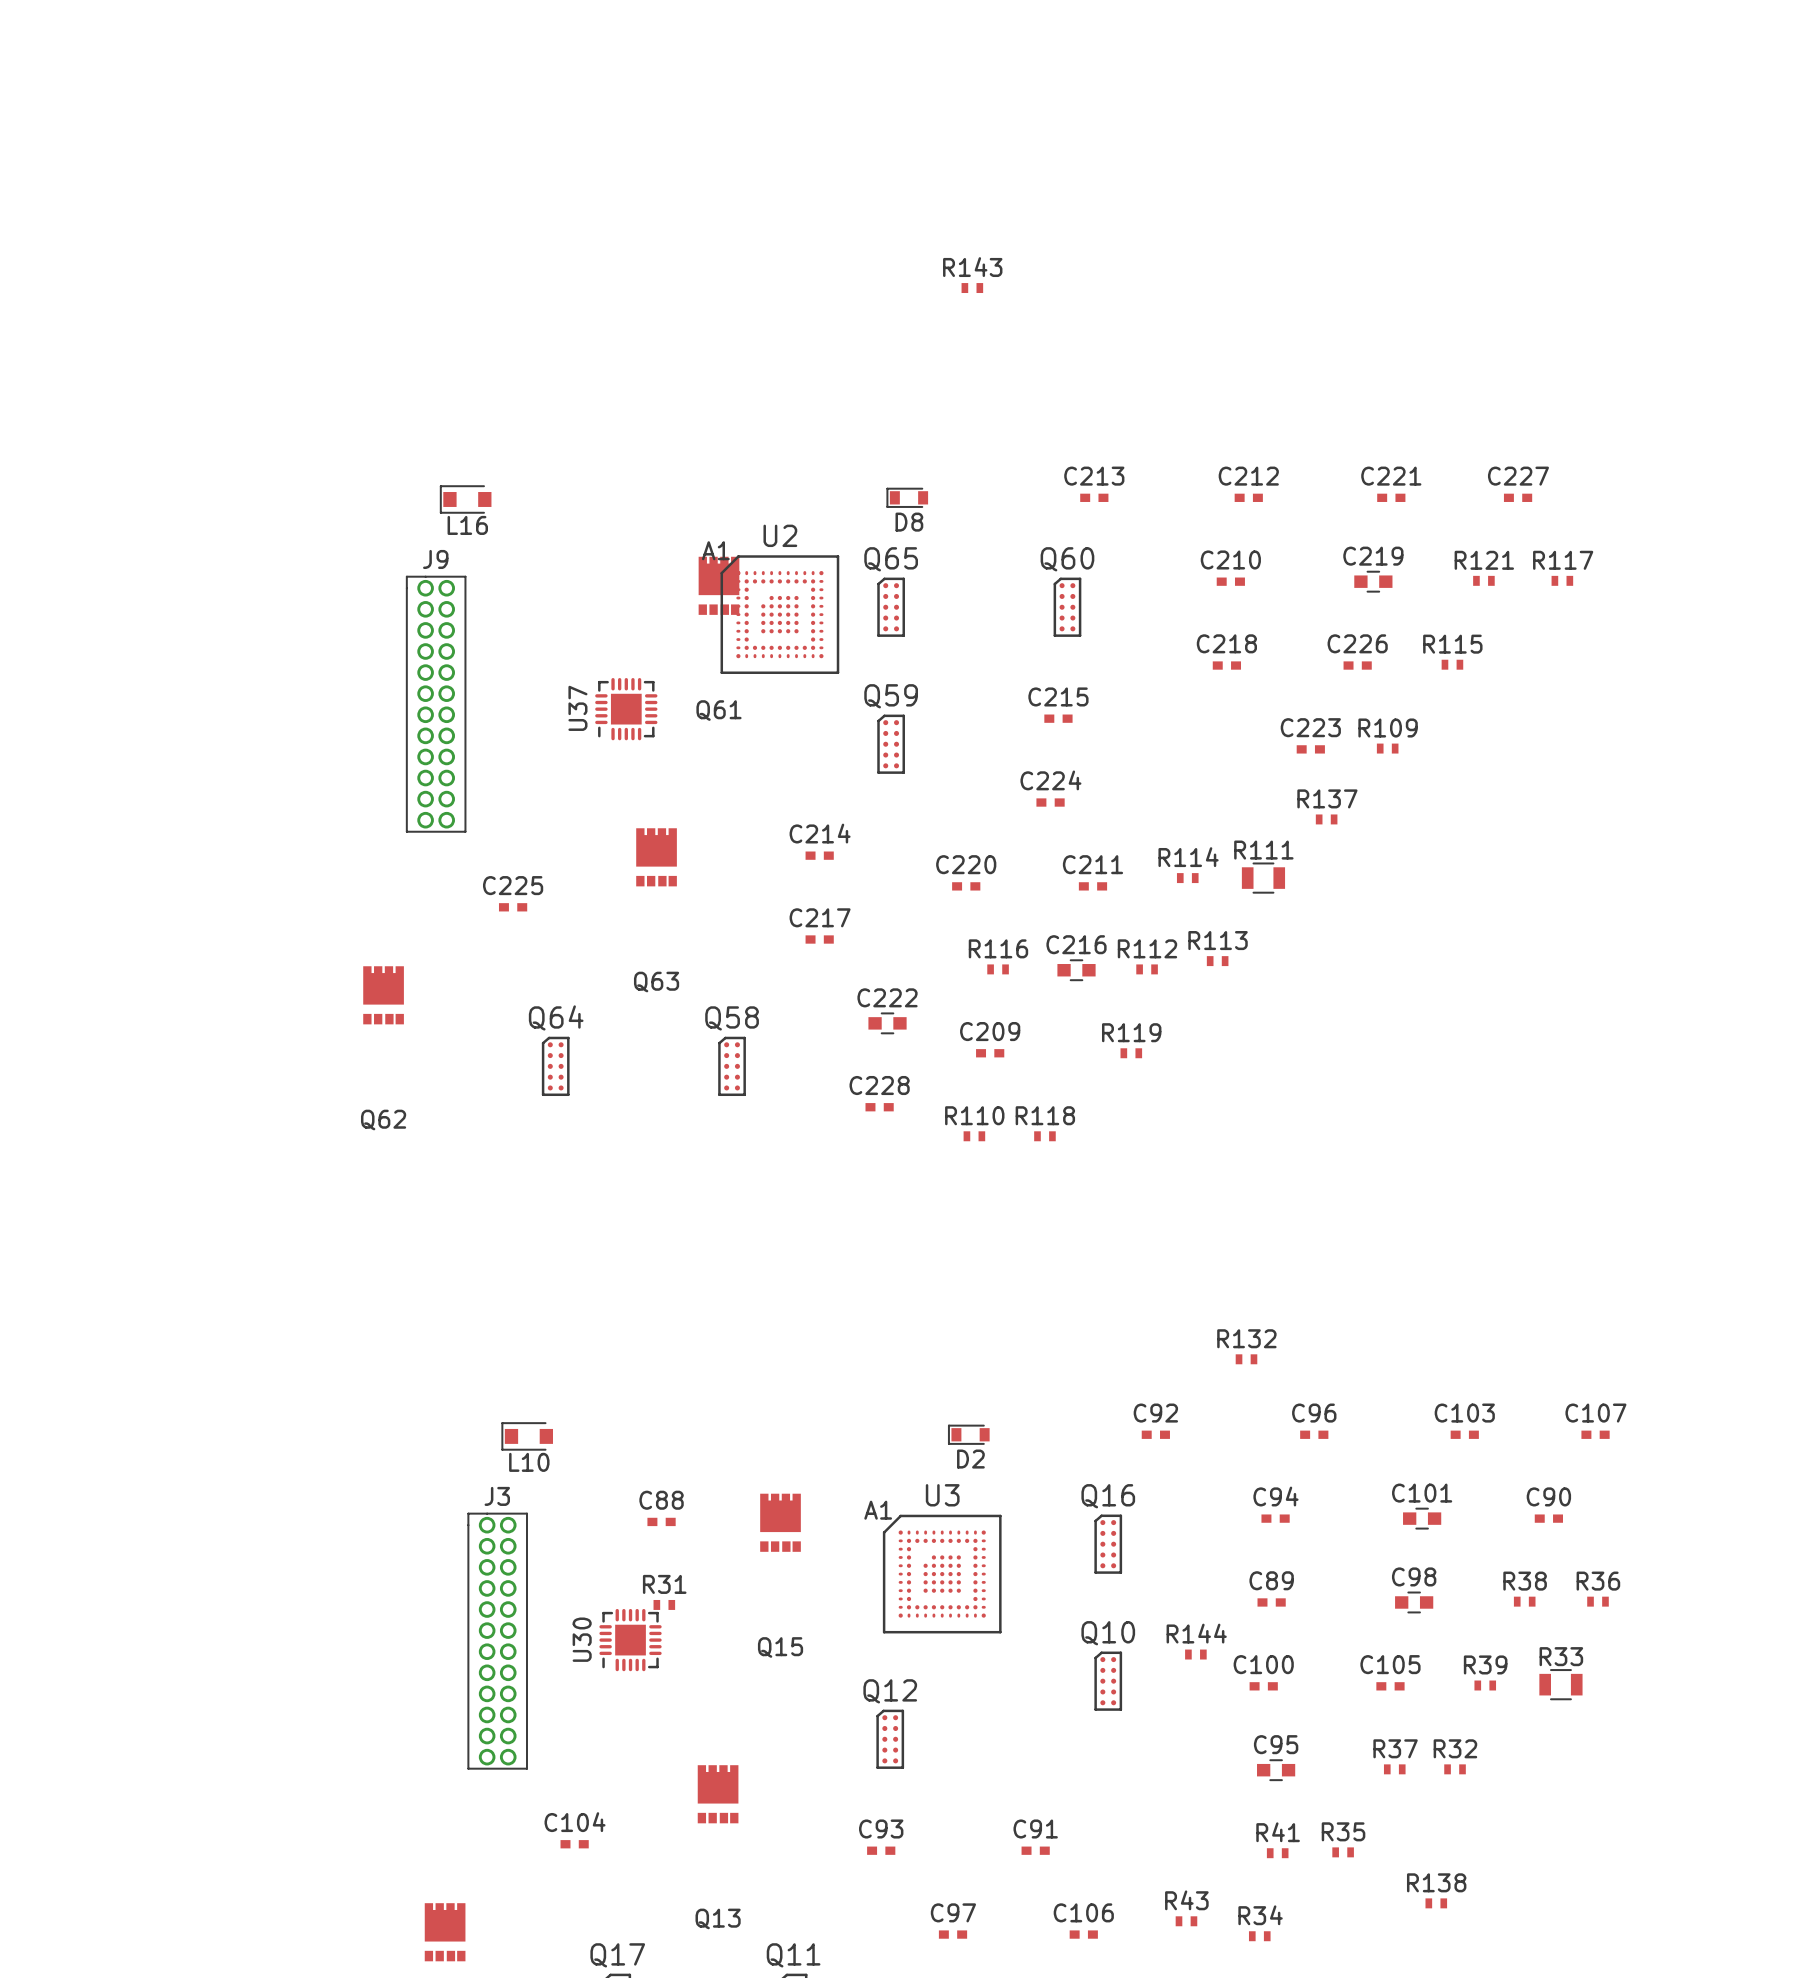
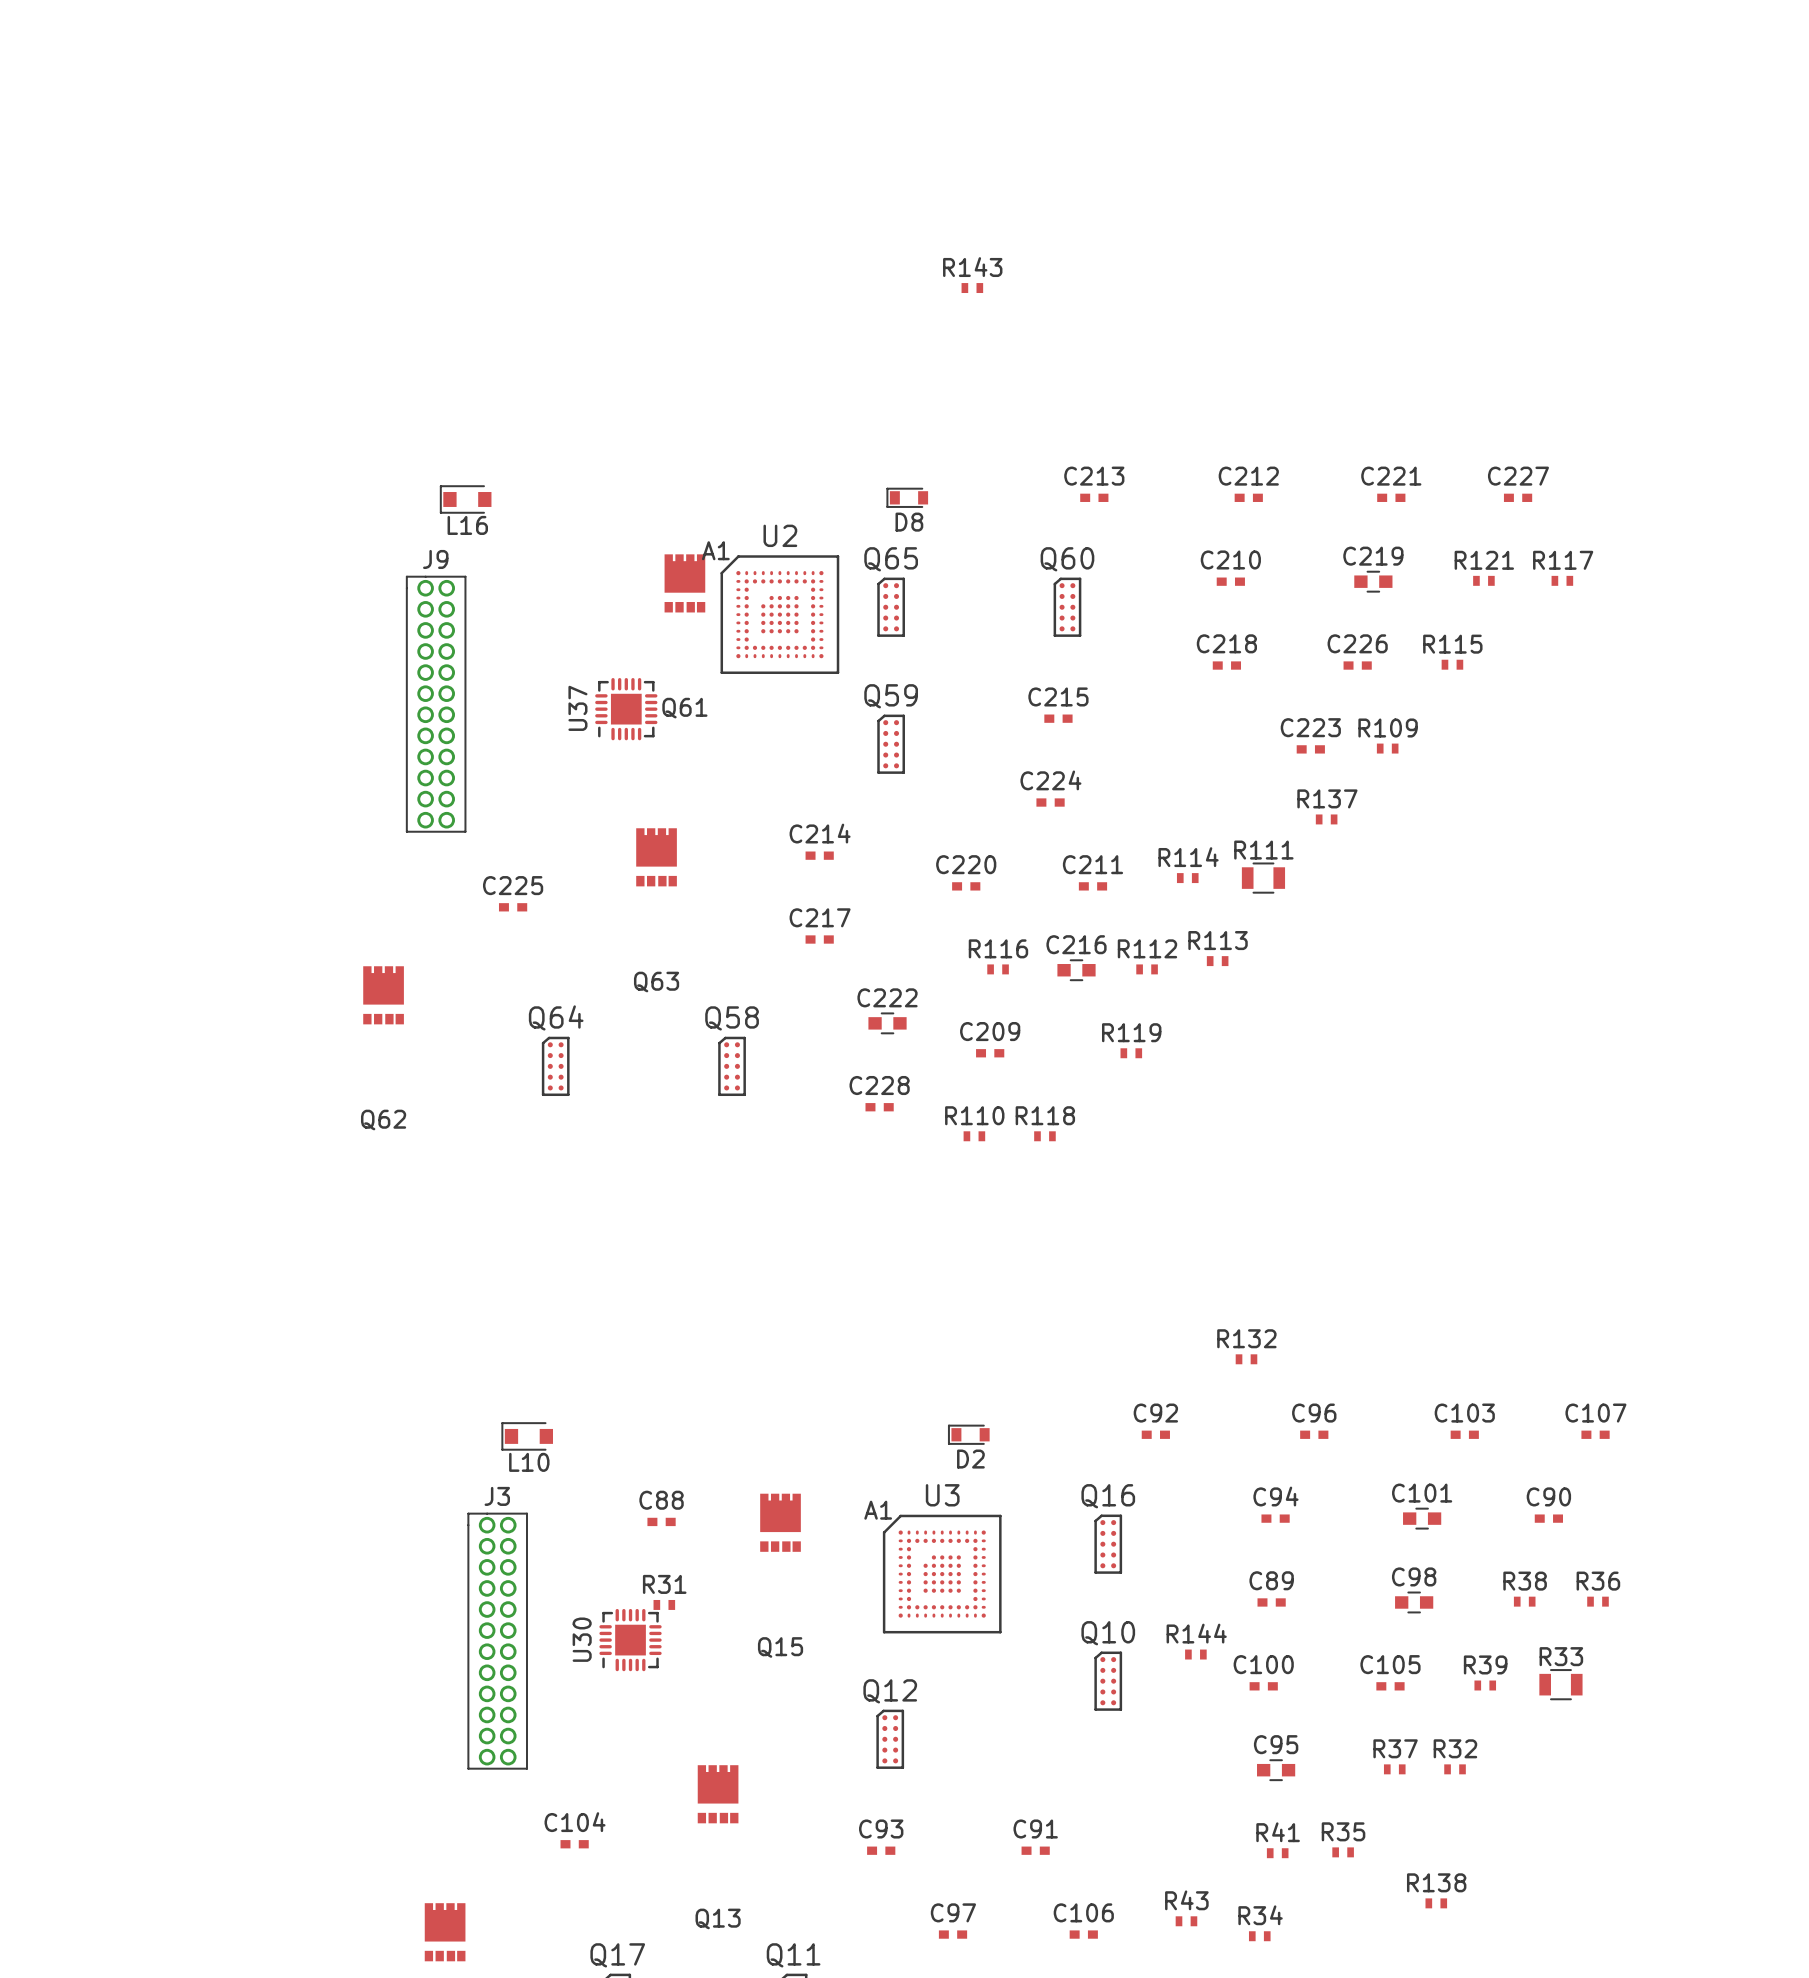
Q61 position: (718, 585) -> (684, 583)

